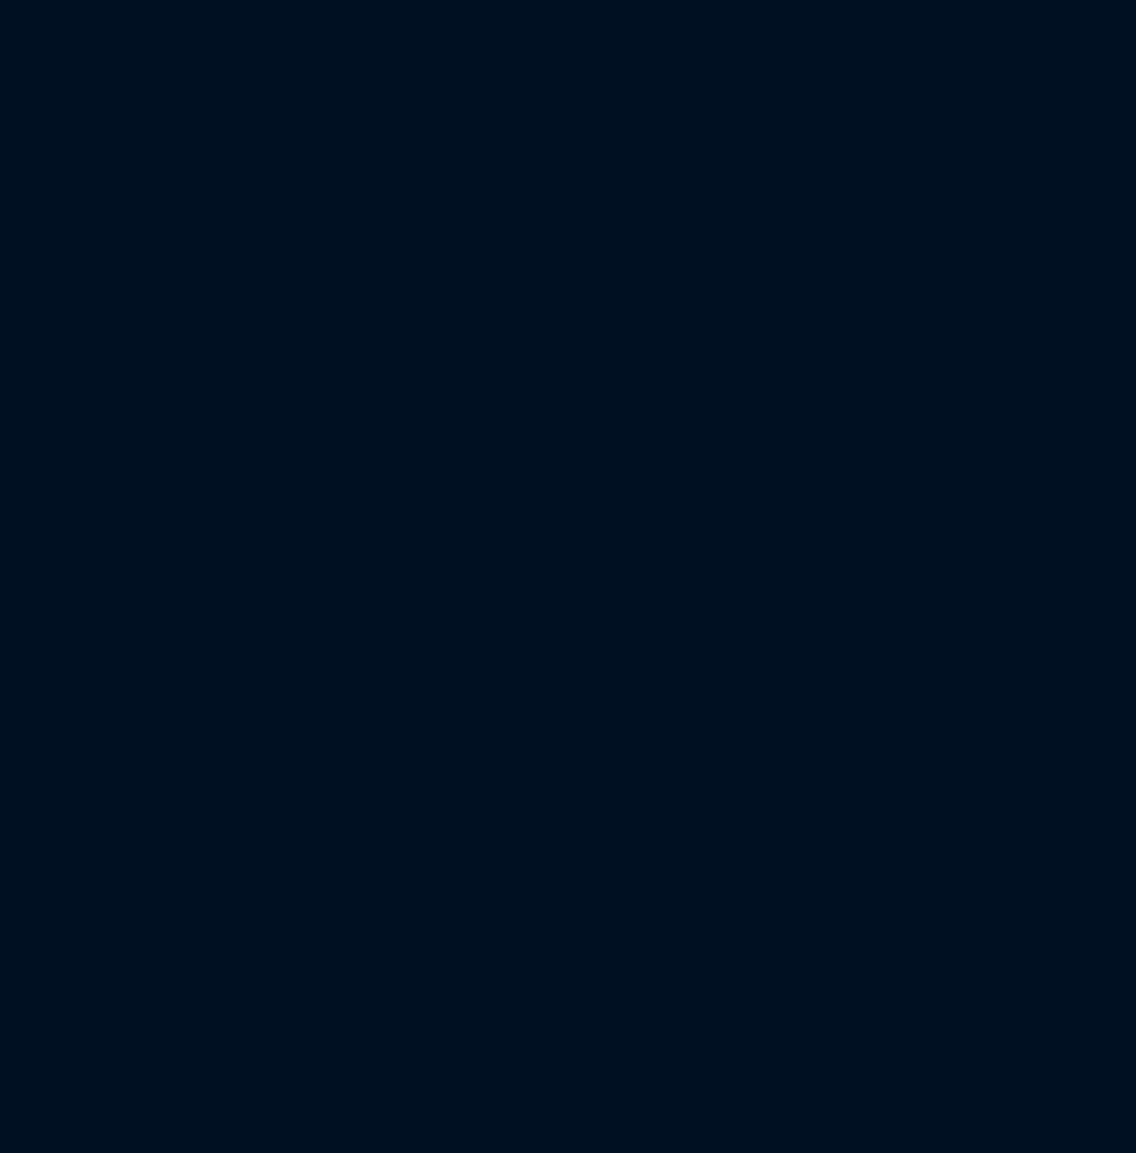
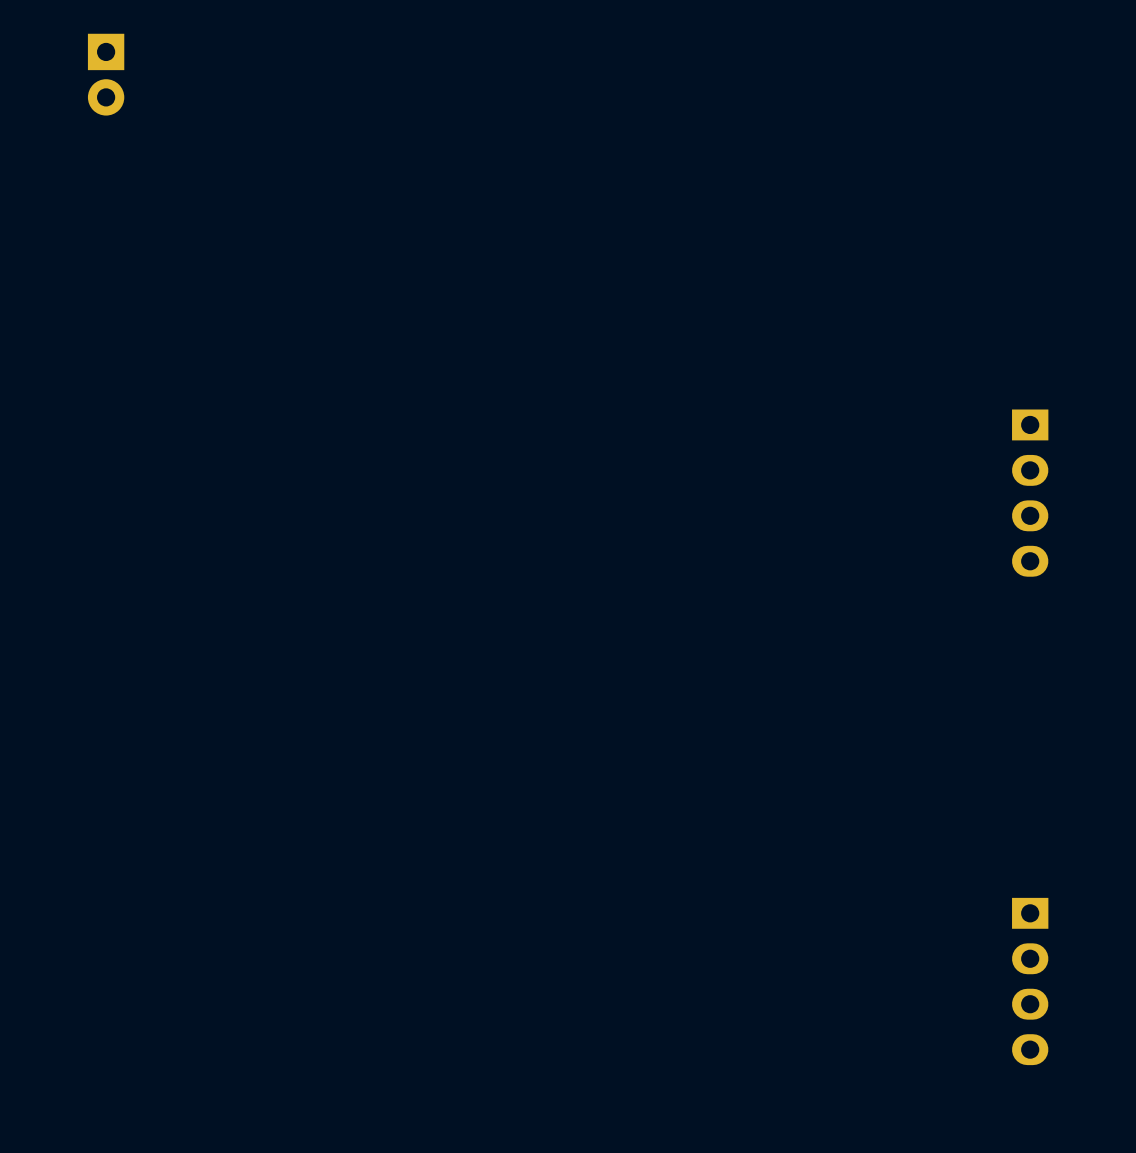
part: none -> (106, 74)
part: none -> (1030, 493)
part: none -> (1030, 981)

